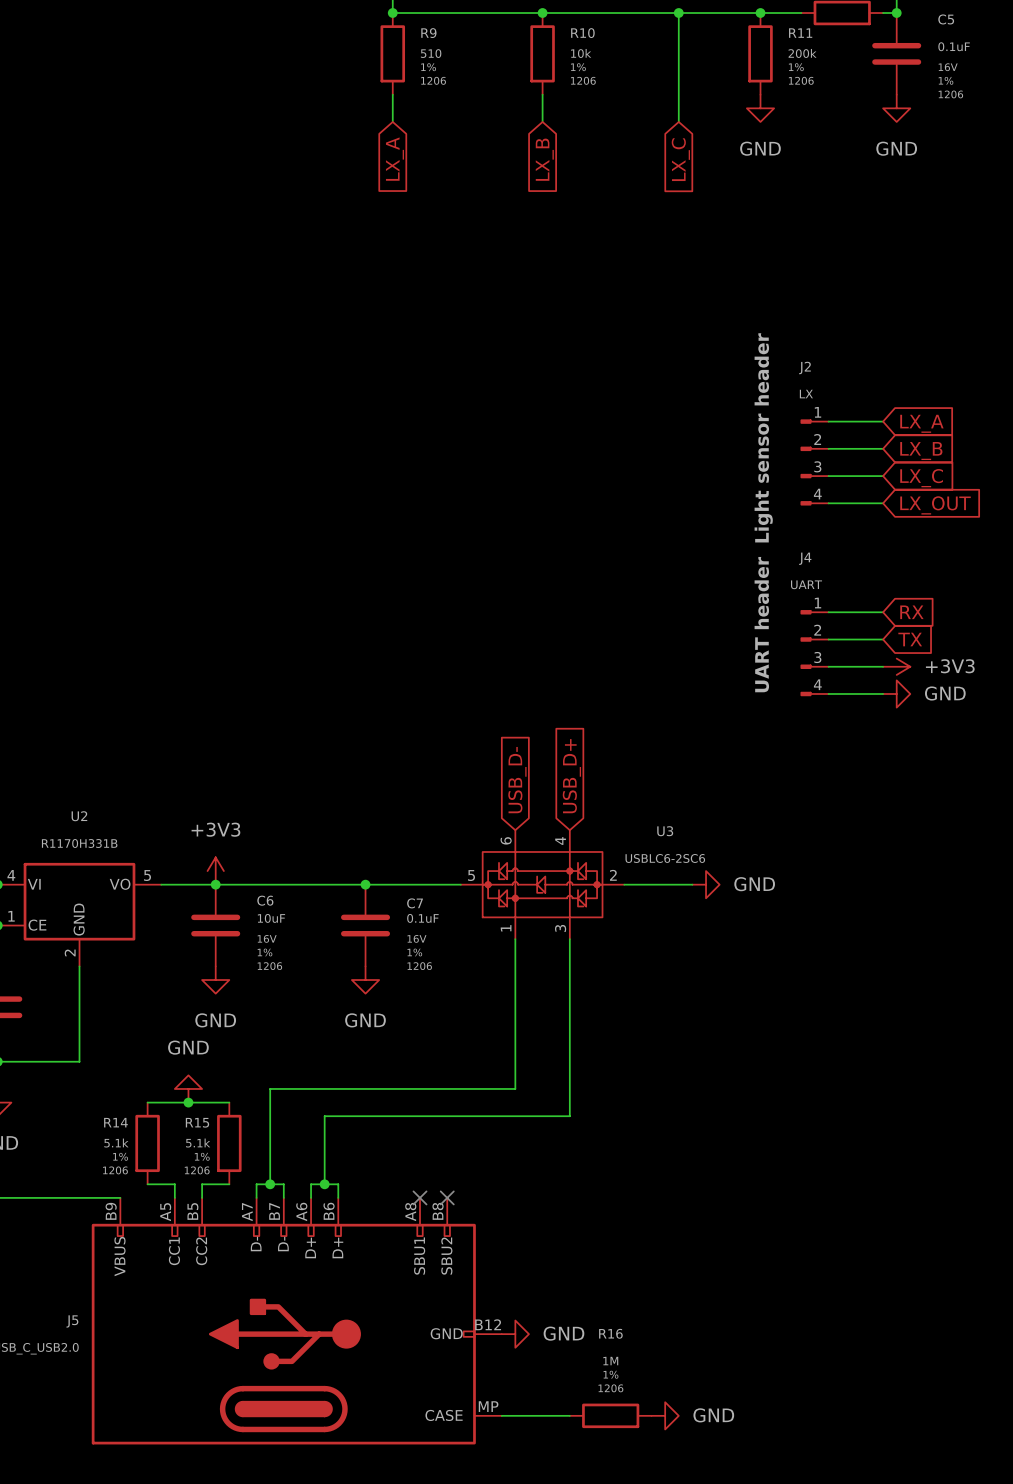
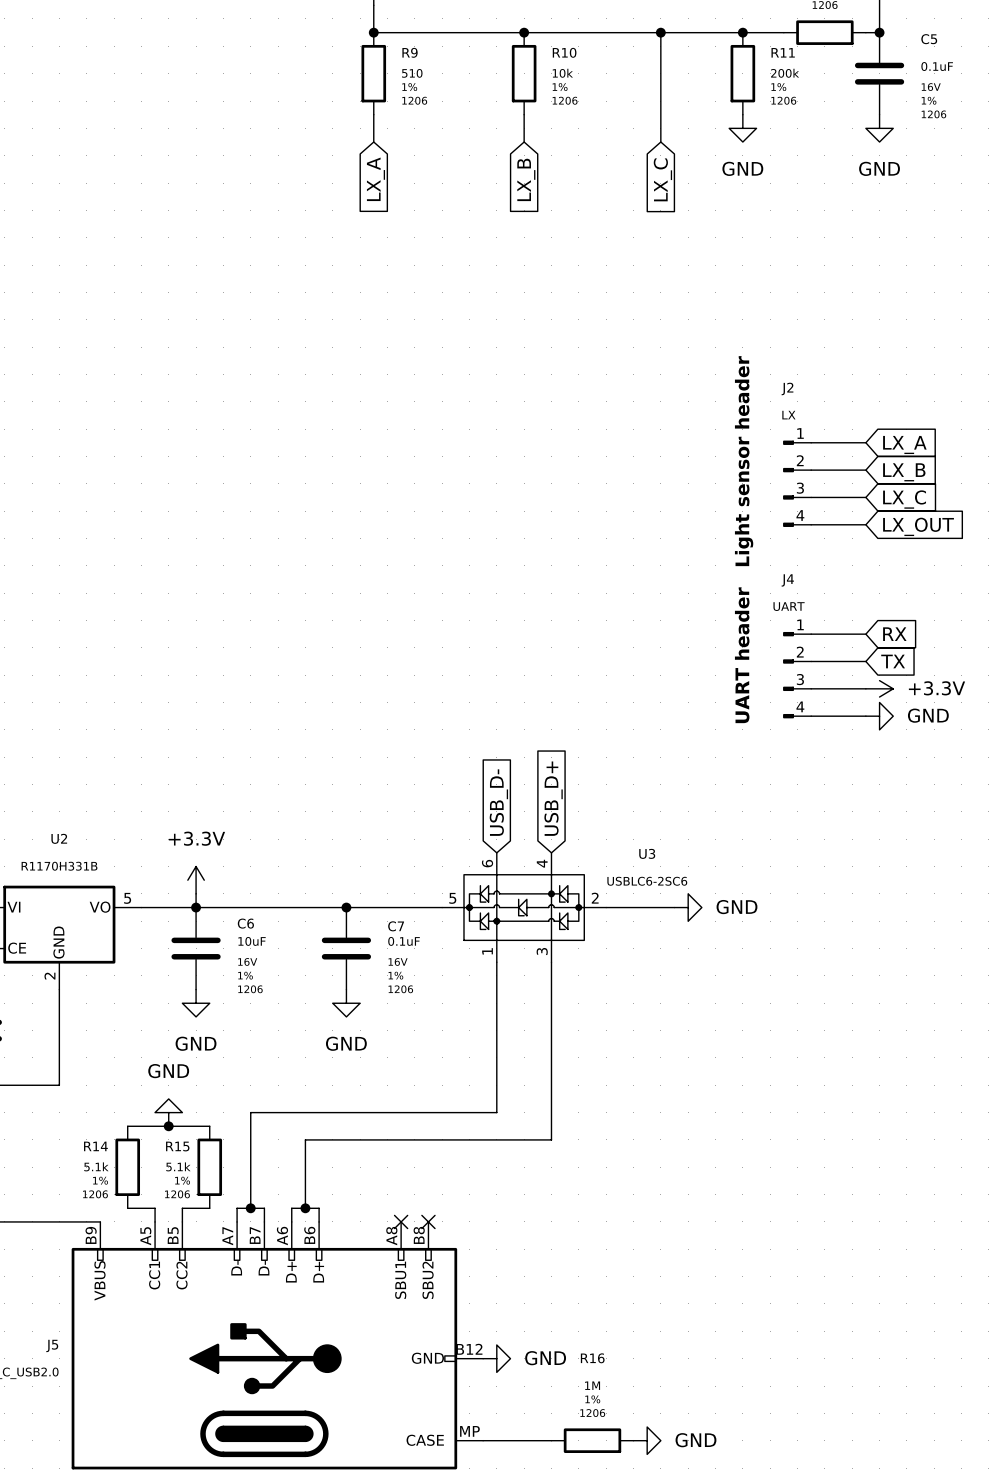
label: Light sensor header (763, 437) -> none
text: none -> Light sensor header (744, 461)
label: UART header (761, 624) -> none
text: none -> UART header (742, 655)
power symbol: +3V3 (896, 666) -> +3.3V (879, 688)
power symbol: none -> +3.3V (196, 880)
power symbol: +3V3 (215, 871) -> none

